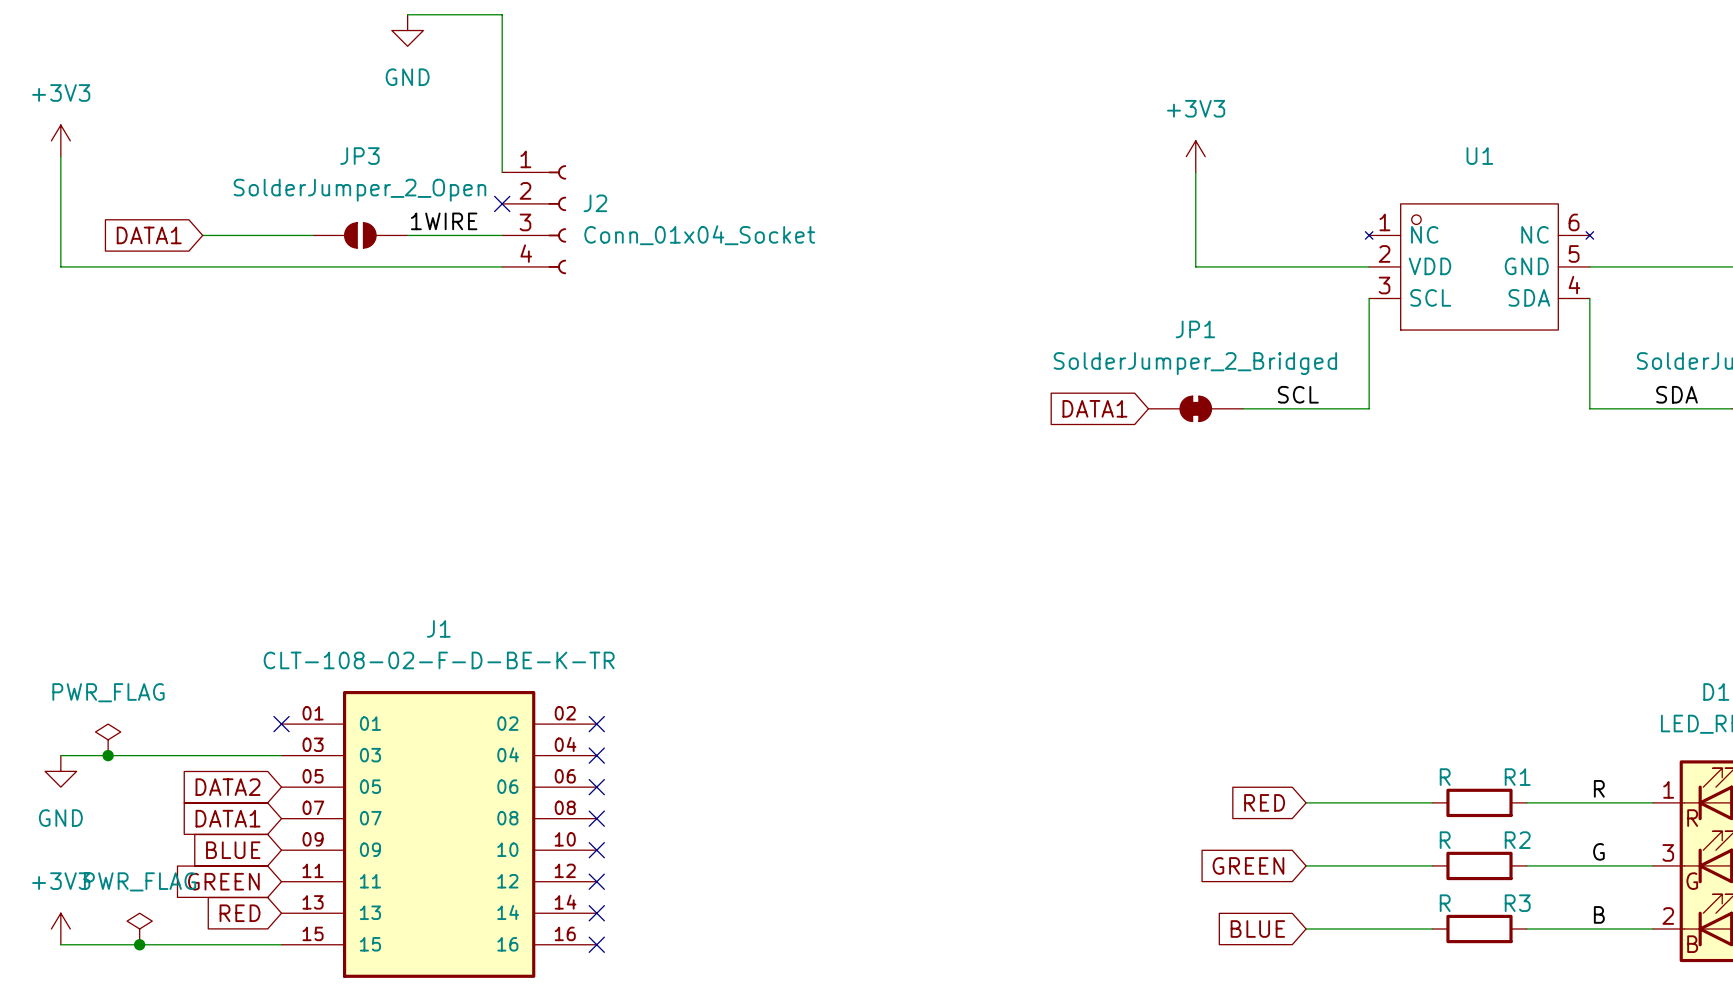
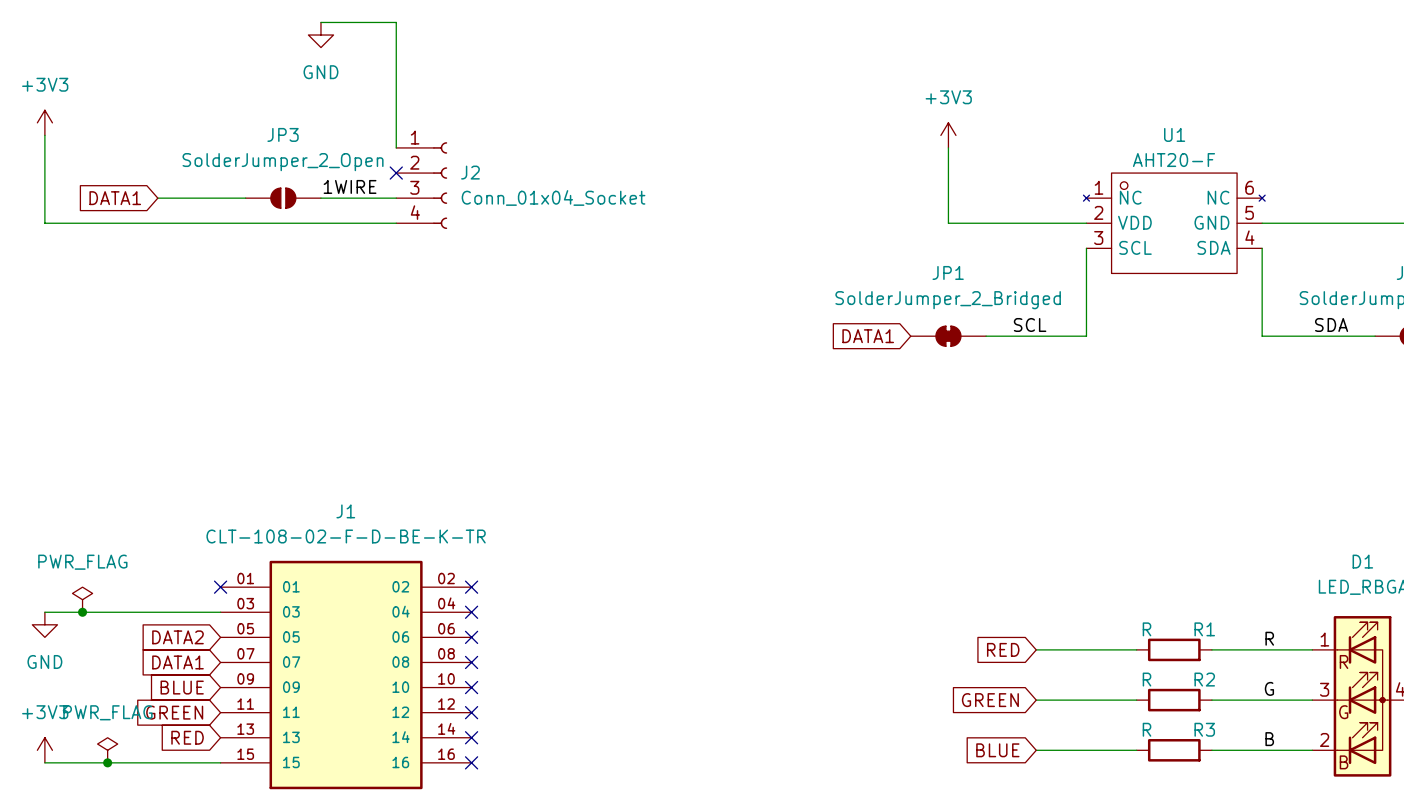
U1 value: none -> AHT20-F (1174, 160)

